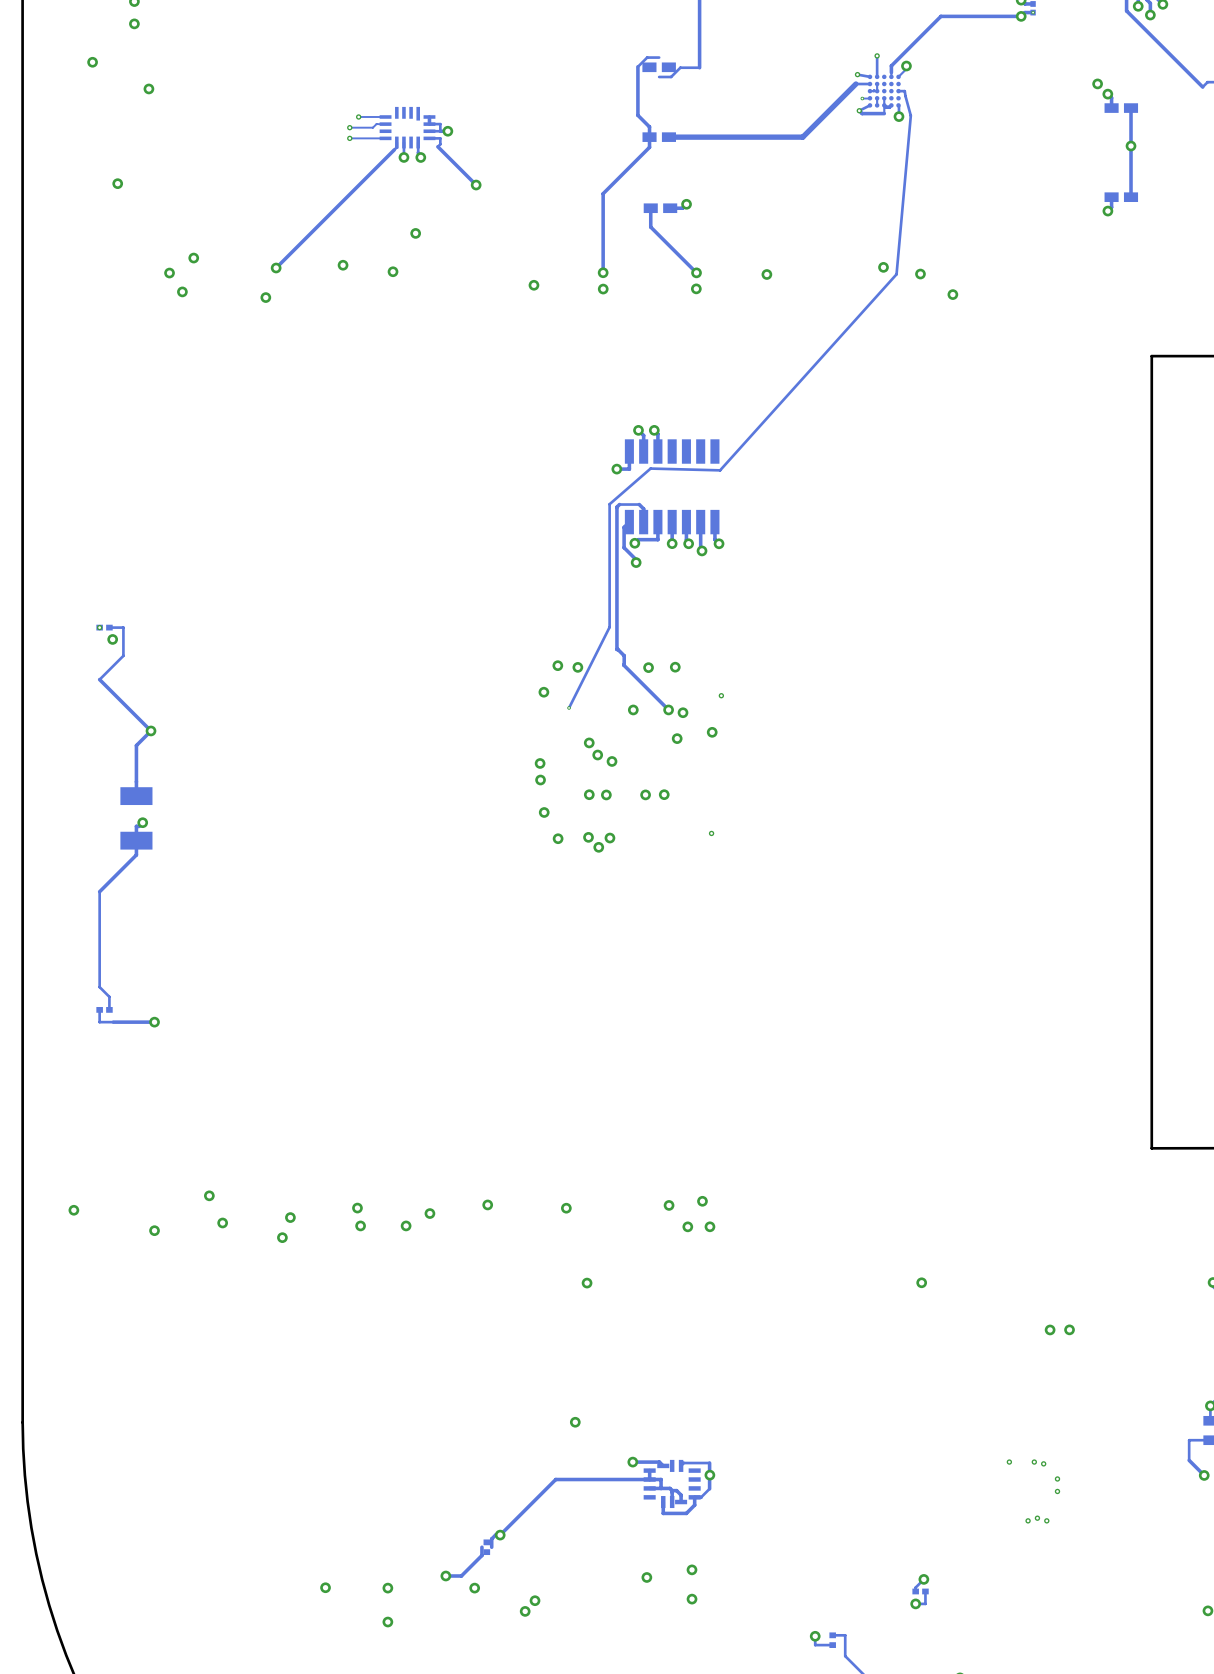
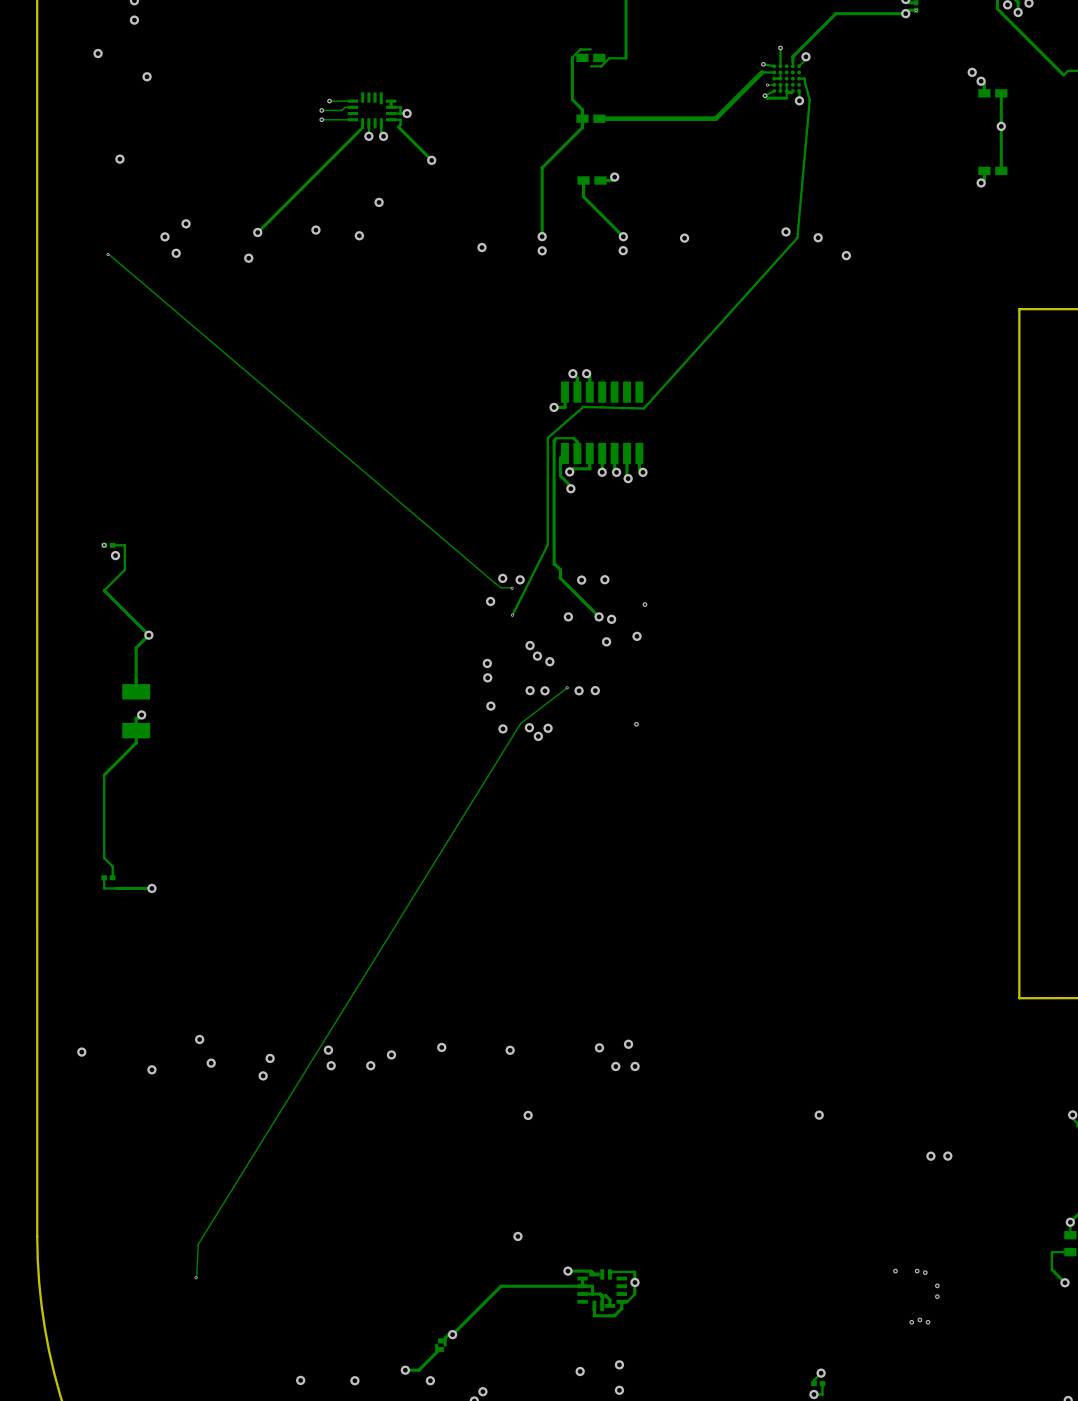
via: none -> (108, 254)
track: none -> (109, 254) (495, 583) (501, 587) (512, 587)
via: none -> (512, 588)
track: none -> (567, 687) (520, 723) (198, 1244) (196, 1276)
via: none -> (567, 687)
via: none -> (196, 1277)

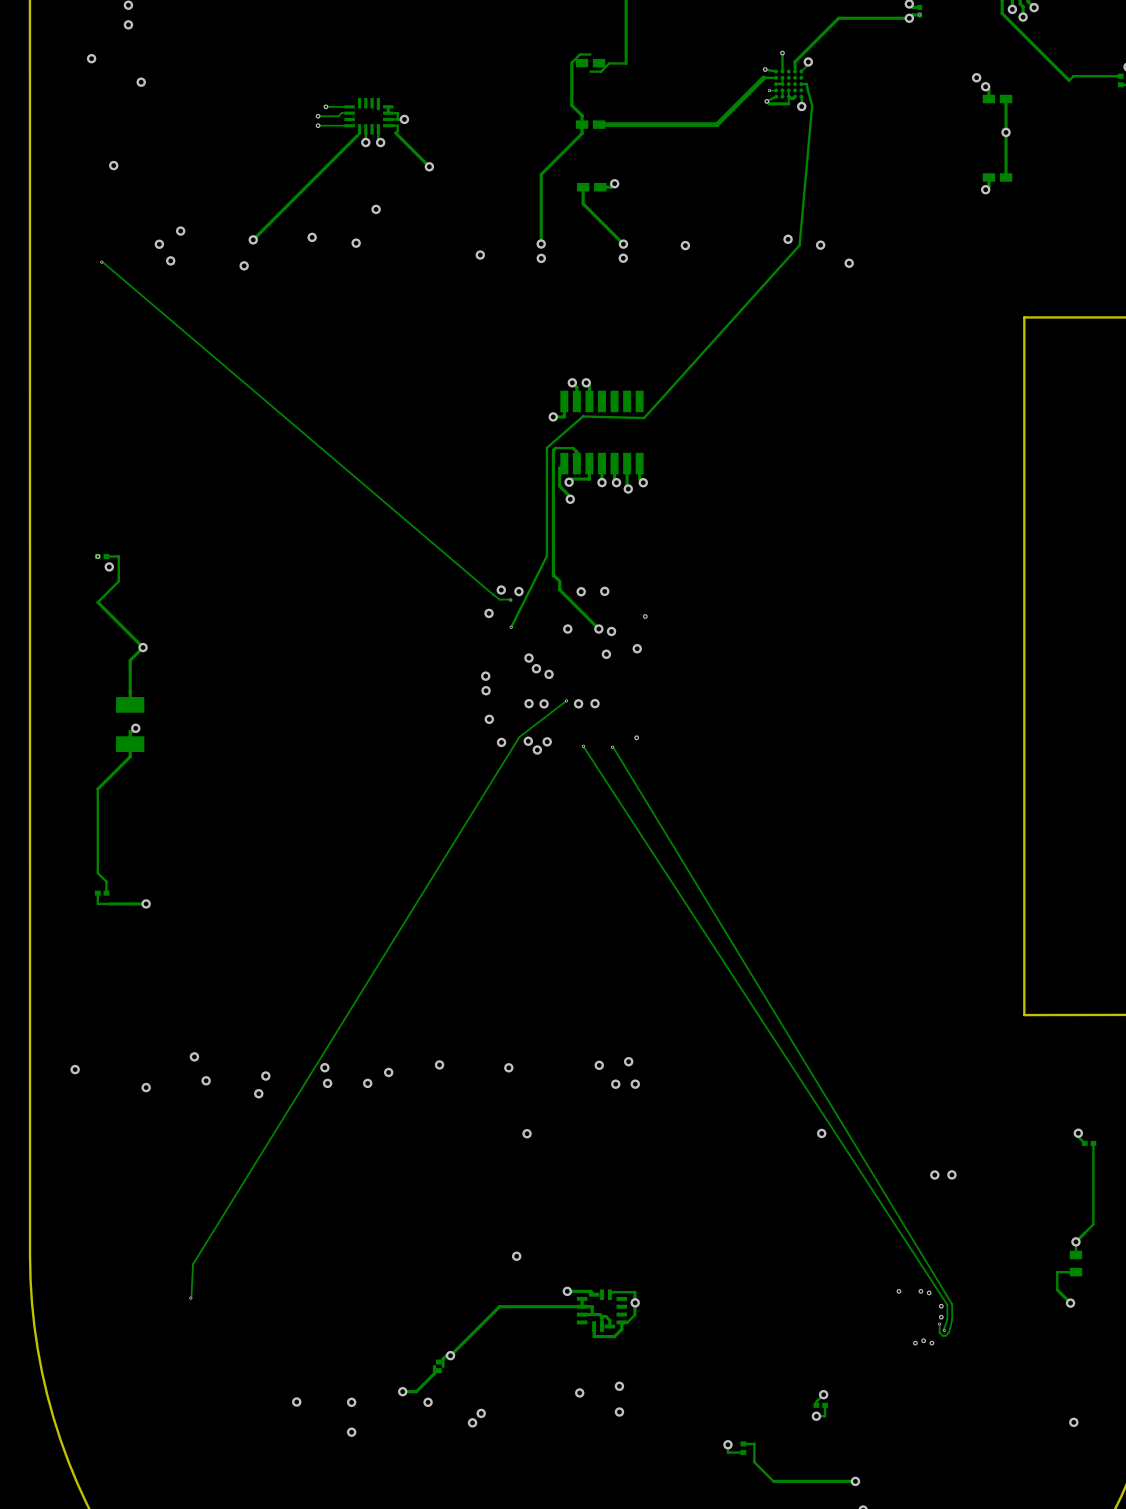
track: none -> (583, 746) (947, 1304) (947, 1319) (944, 1328)
via: none -> (583, 746)
via: none -> (612, 747)
track: none -> (613, 747) (952, 1304) (952, 1320) (949, 1332) (942, 1335) (939, 1332) (939, 1326)
via: none -> (939, 1324)
via: none -> (944, 1330)

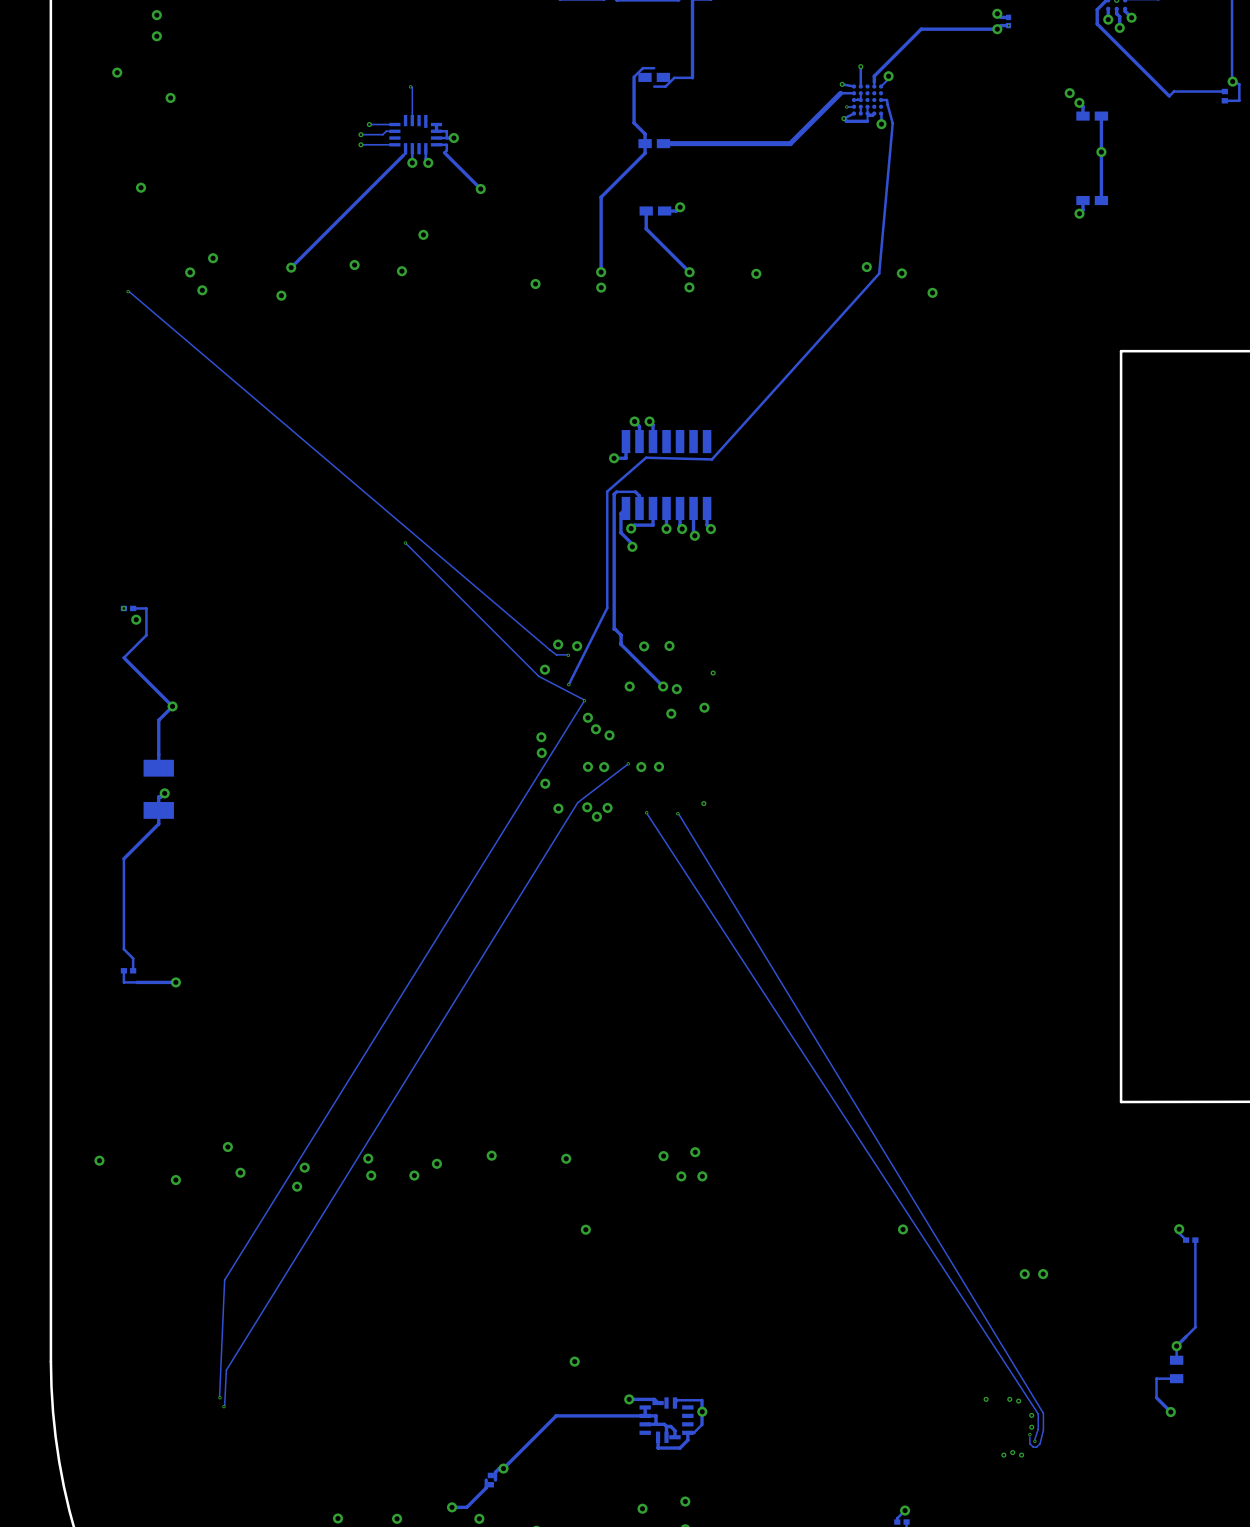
via: none -> (410, 86)
track: none -> (412, 86) (412, 120)
track: none -> (405, 542) (538, 676) (584, 700)
via: none -> (405, 542)
track: none -> (584, 700) (224, 1280) (219, 1396)
via: none -> (584, 700)
via: none -> (219, 1397)

